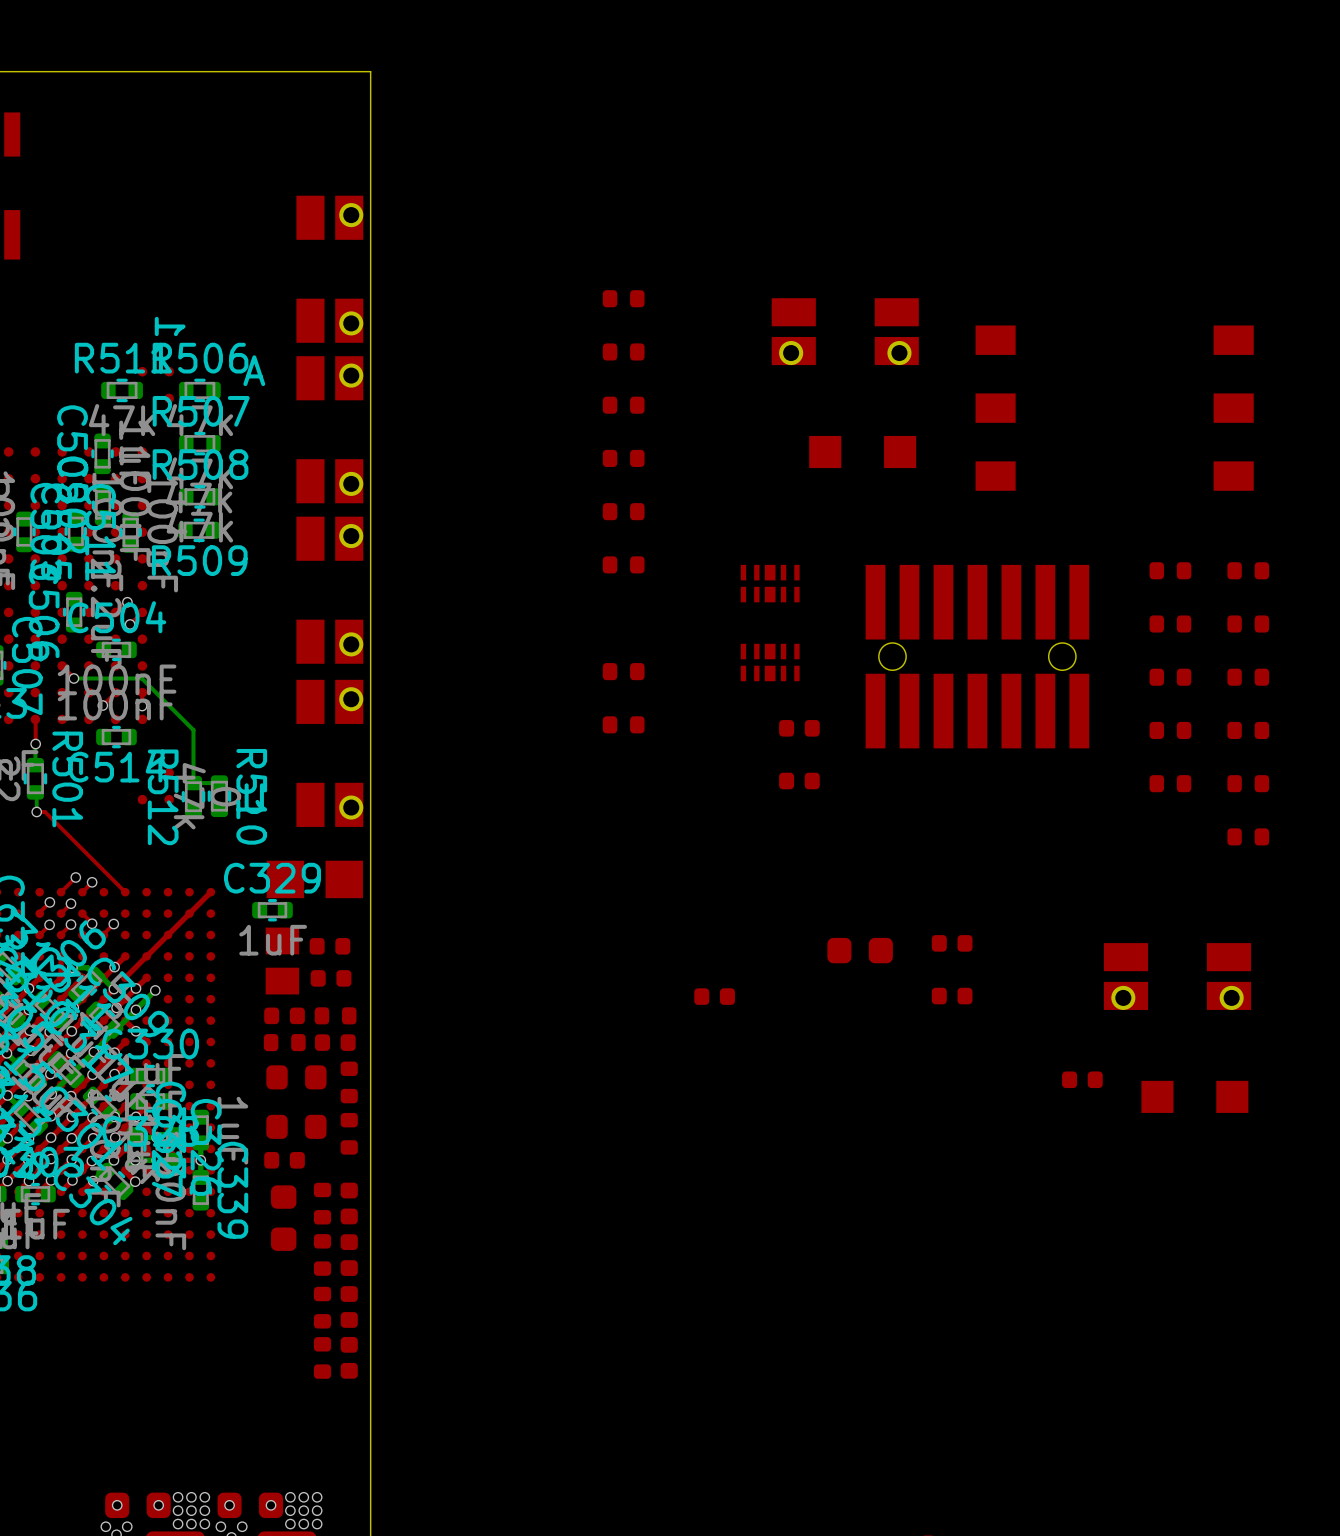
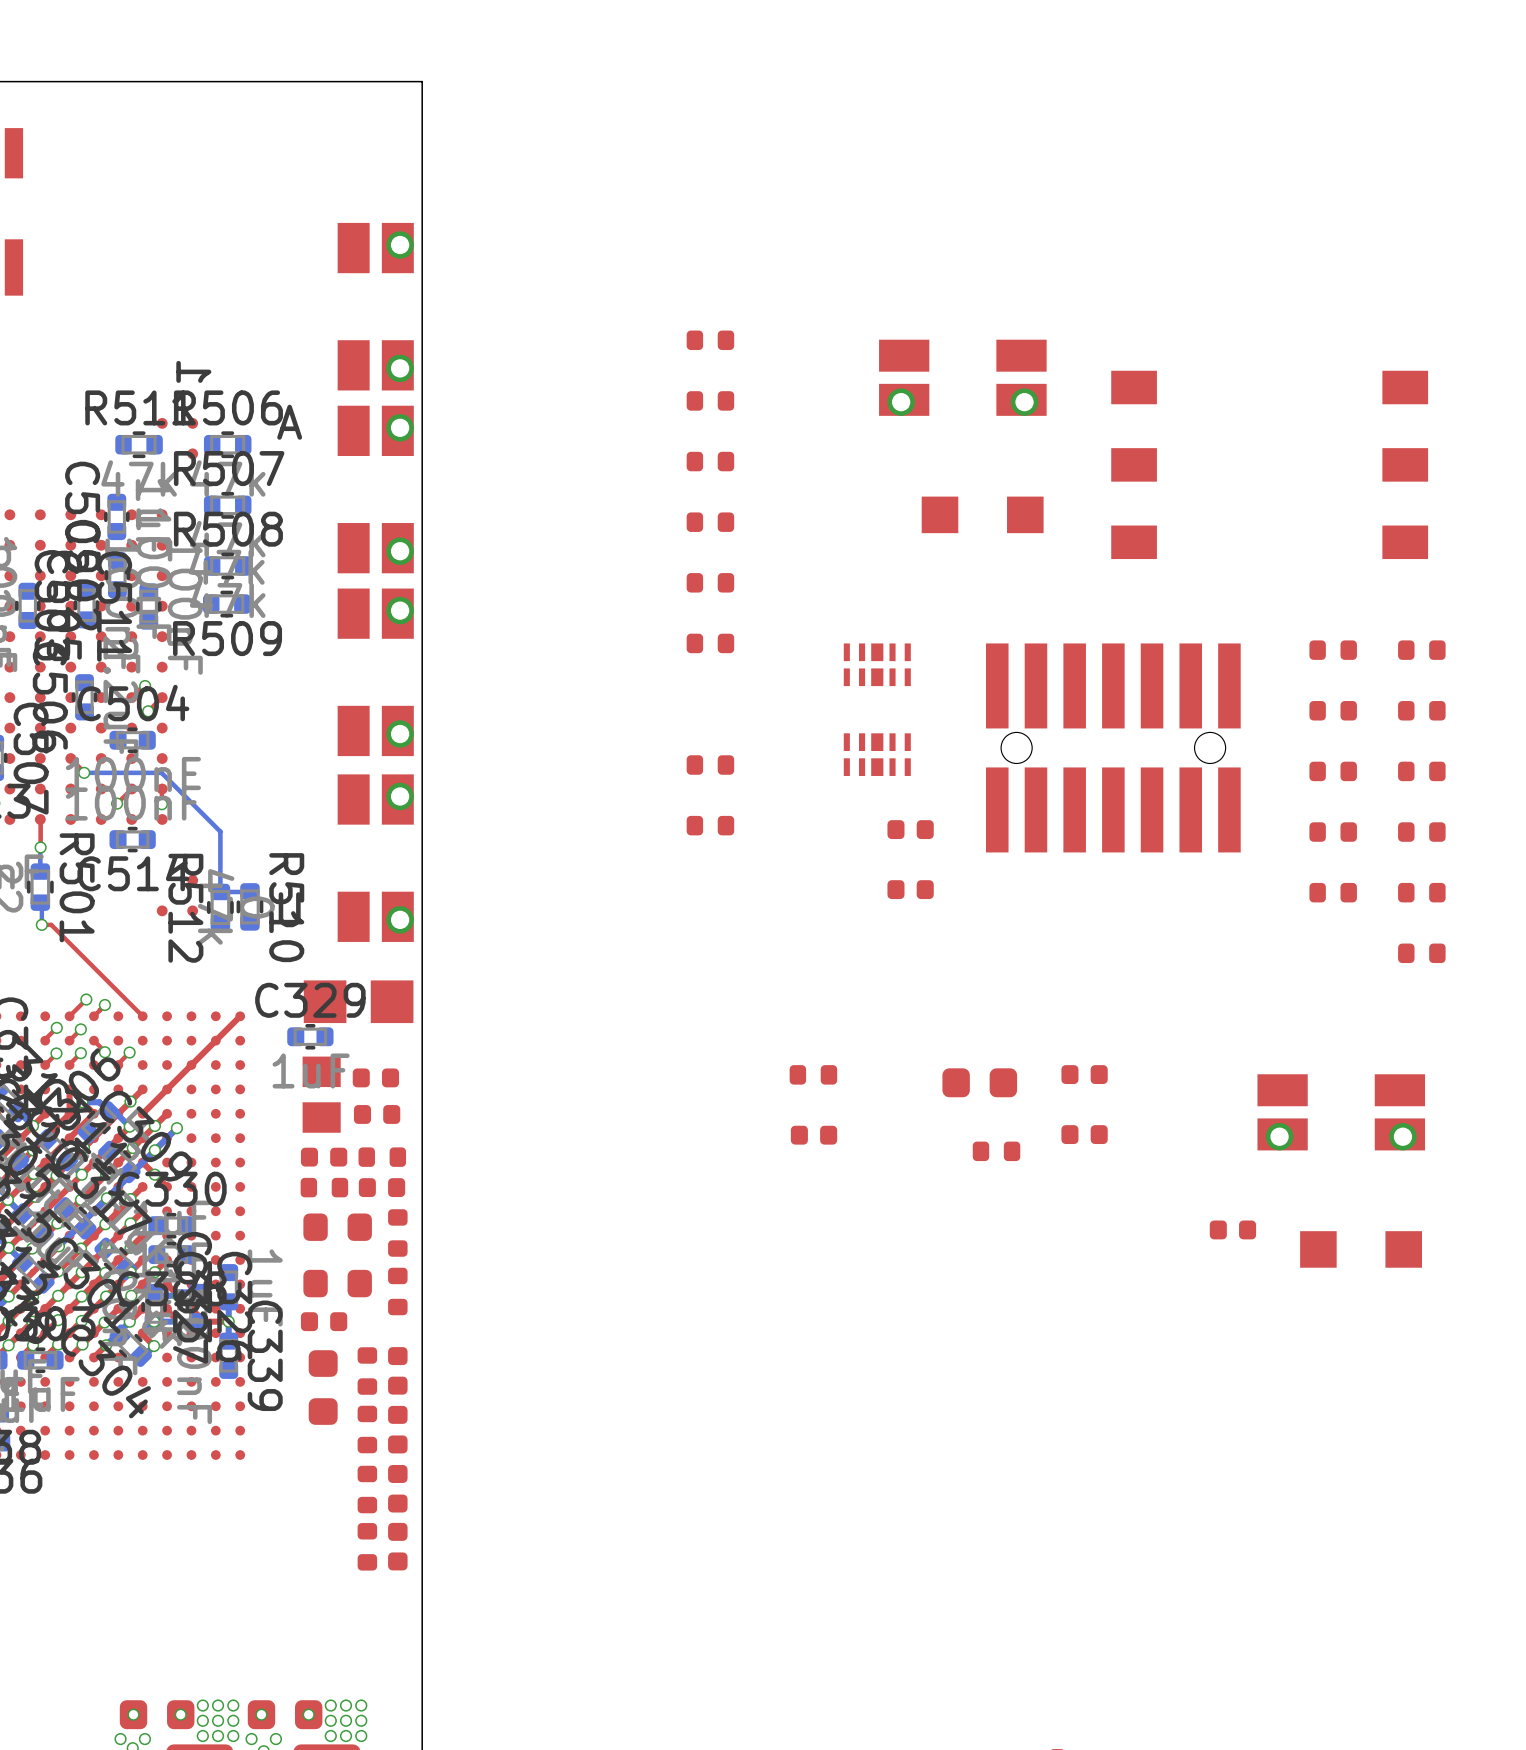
part: none -> (813, 1074)
part: none -> (996, 1151)

